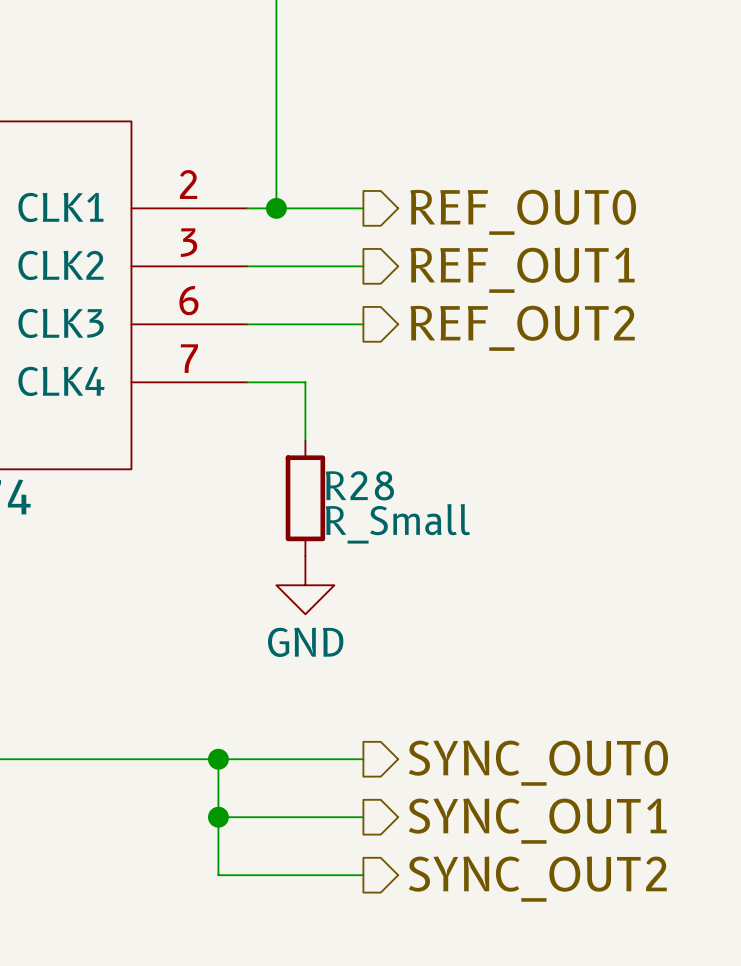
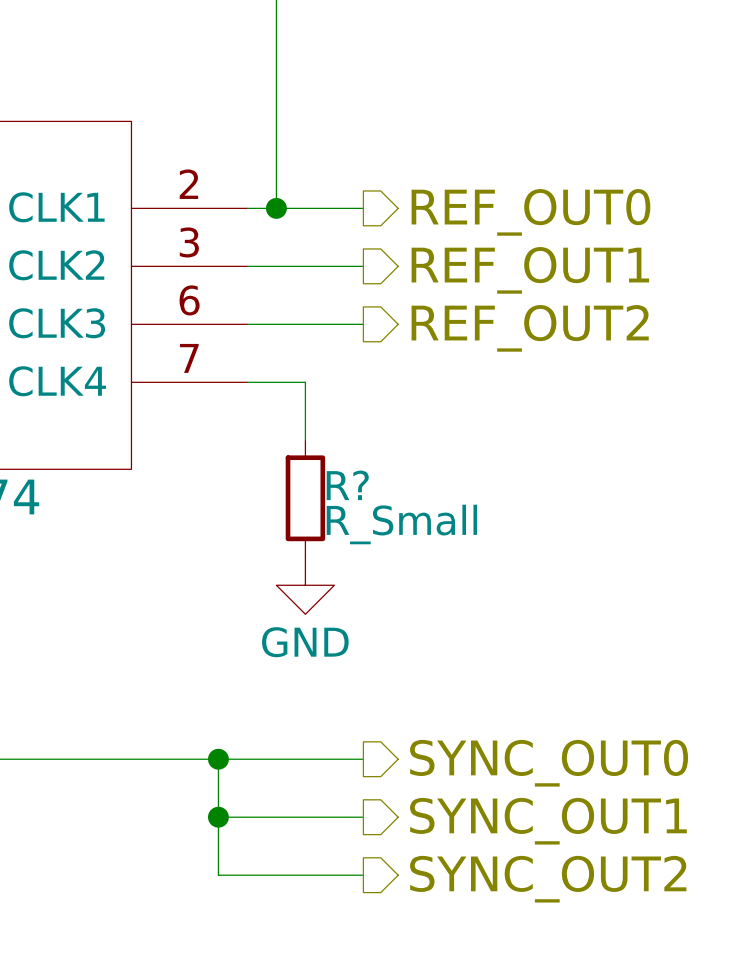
R28 name: R28 (359, 485) -> R? (347, 485)

